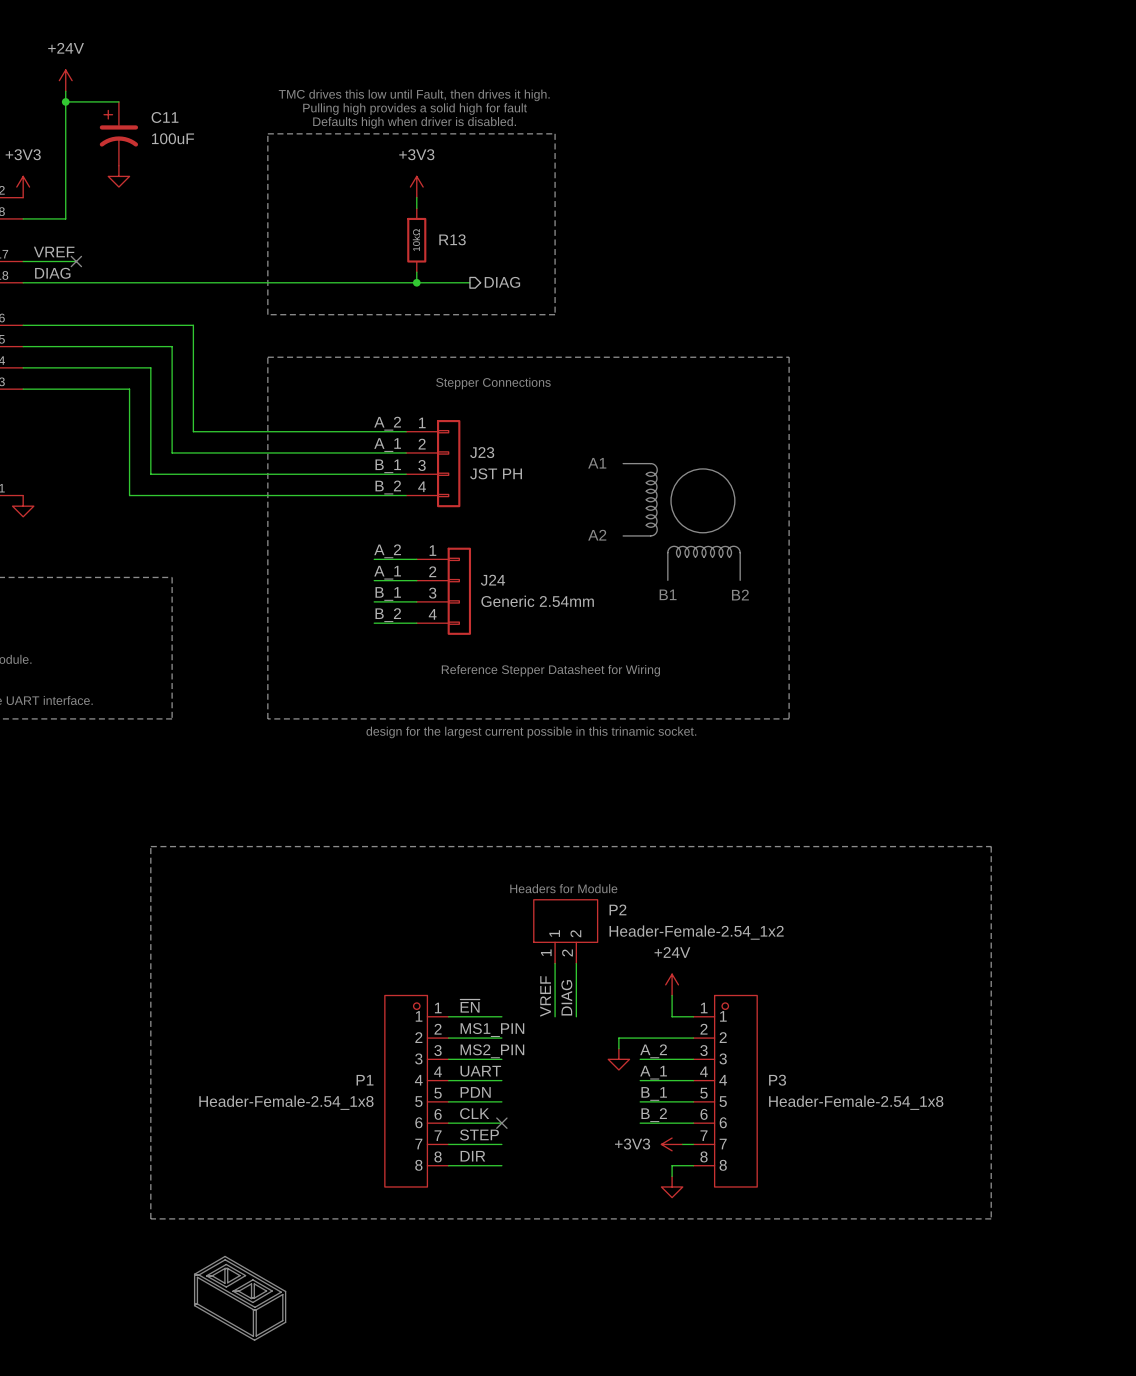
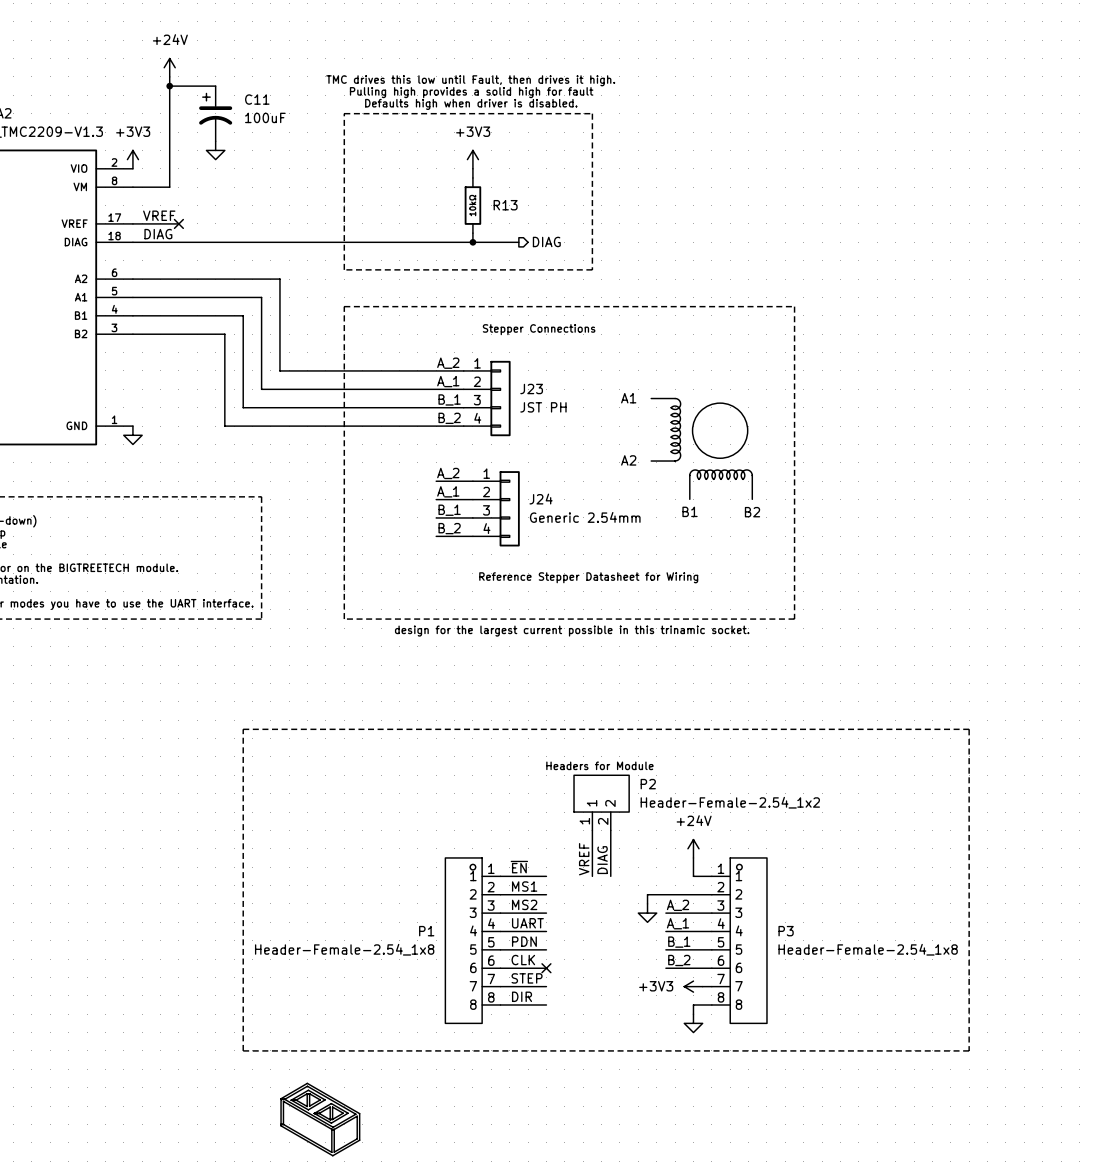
label: MS1_PIN (492, 1030) -> MS1 (524, 886)
label: MS2_PIN (492, 1051) -> MS2 (524, 904)

